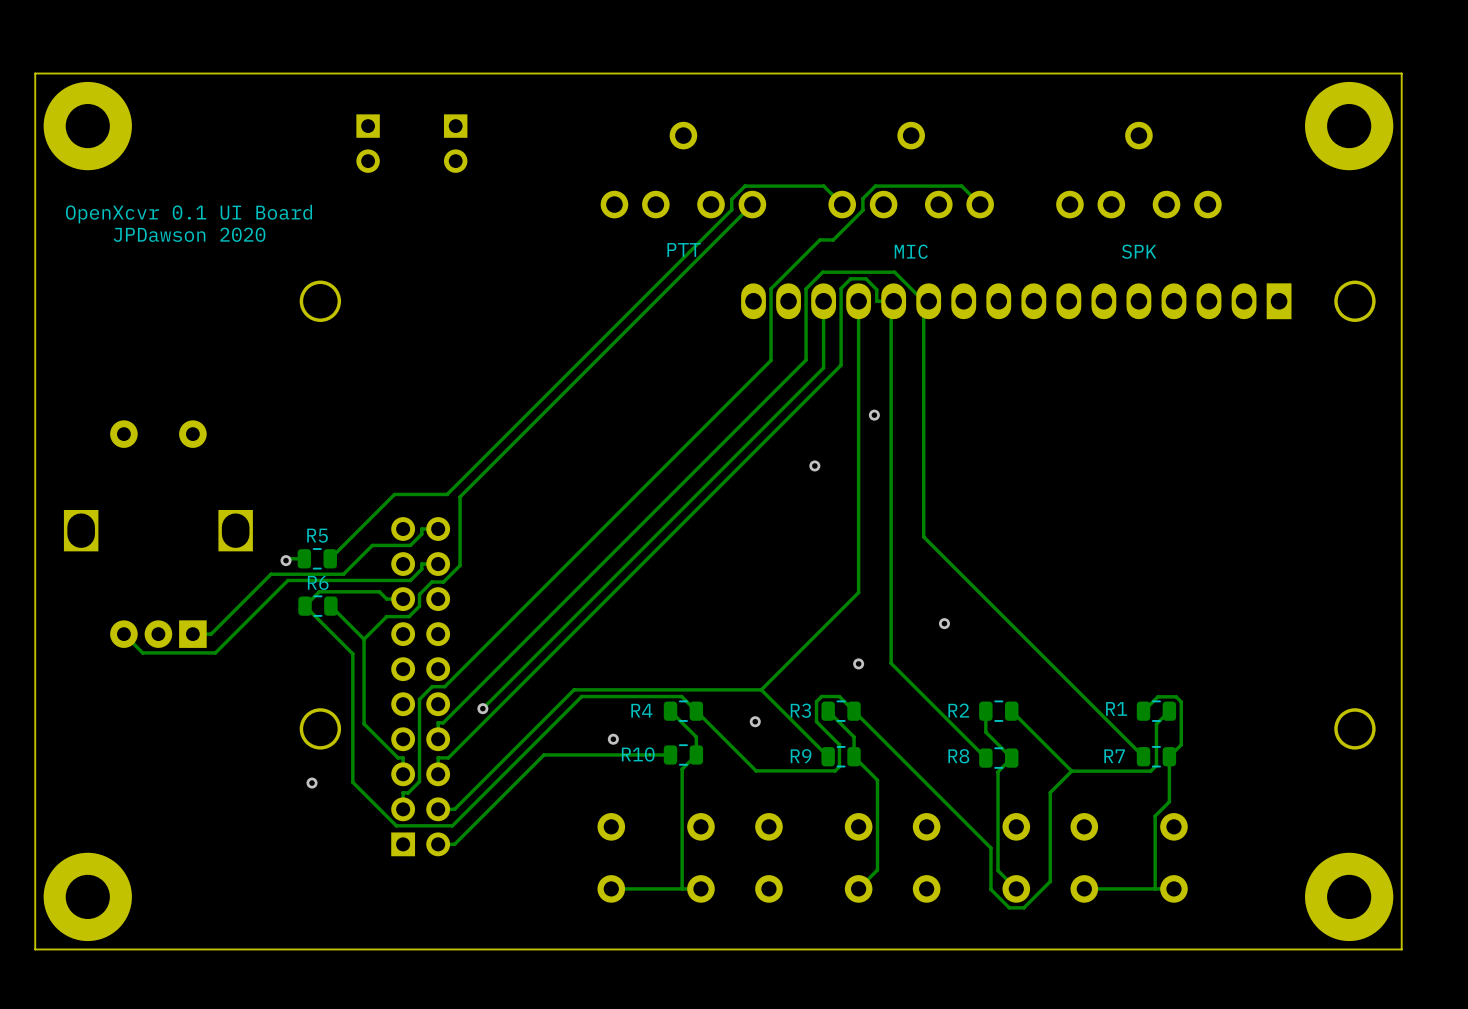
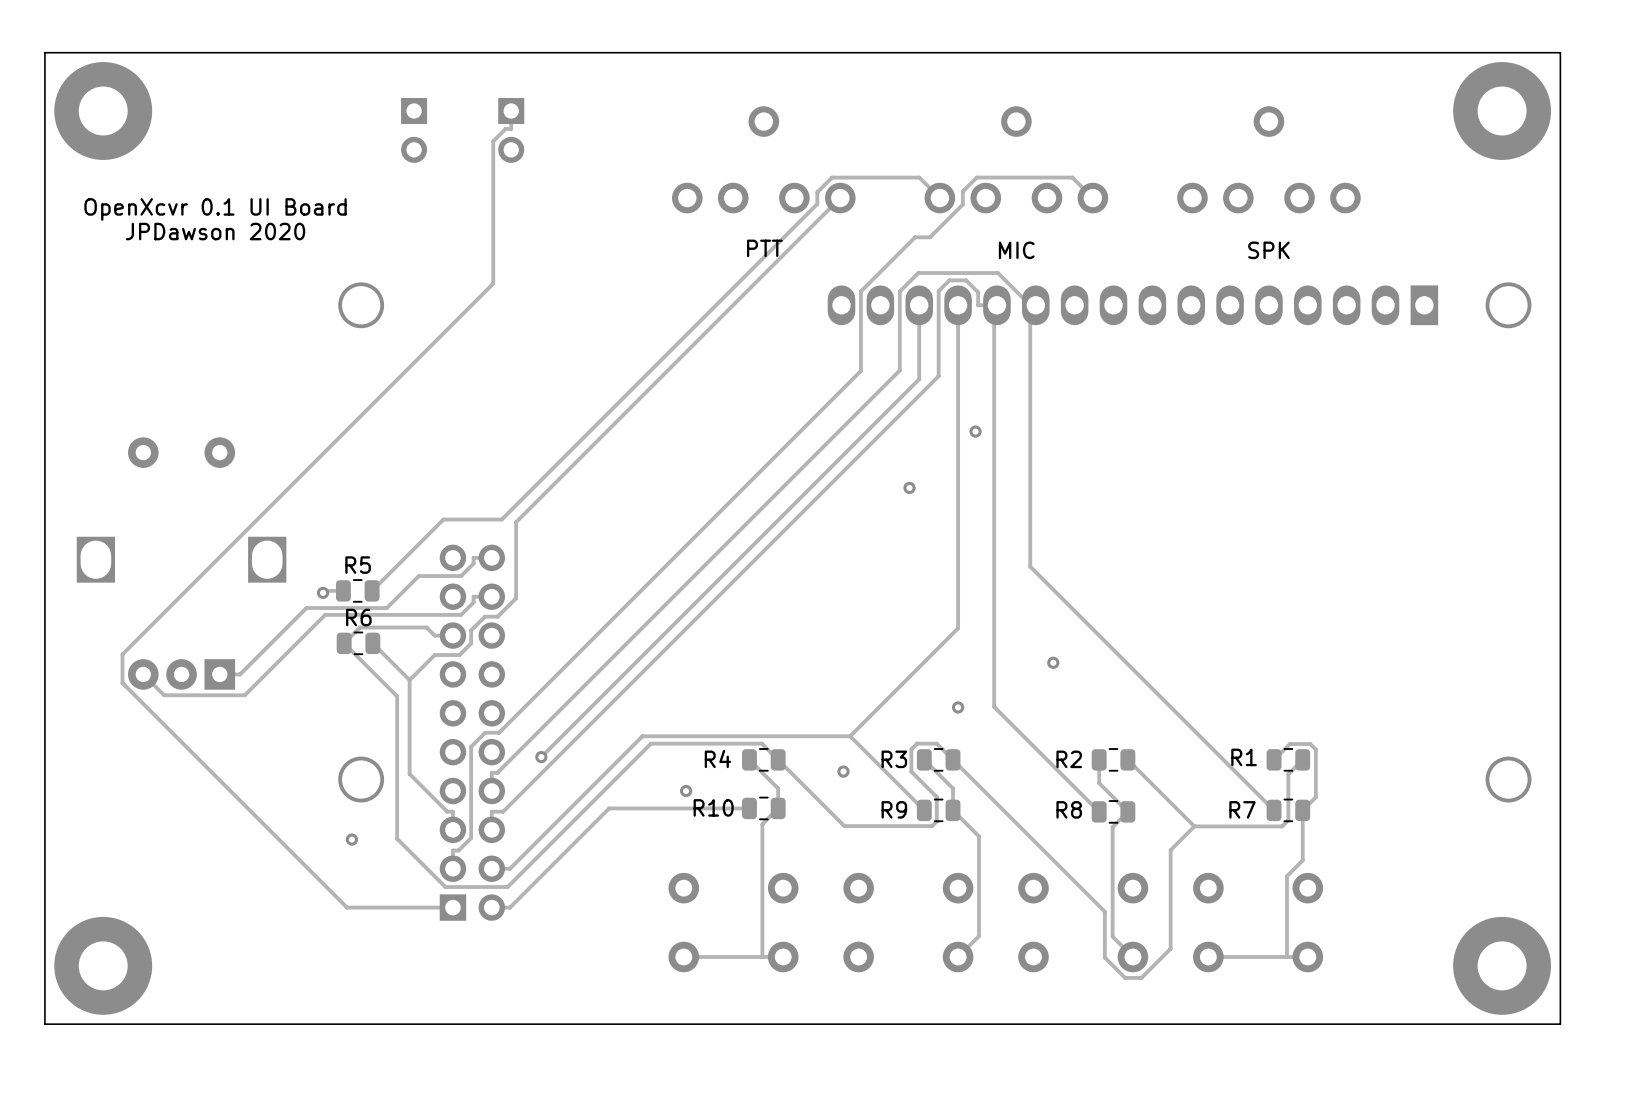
track: none -> (511, 111) (511, 128) (505, 128) (493, 141) (493, 283) (122, 654) (122, 683) (347, 907) (452, 907)

